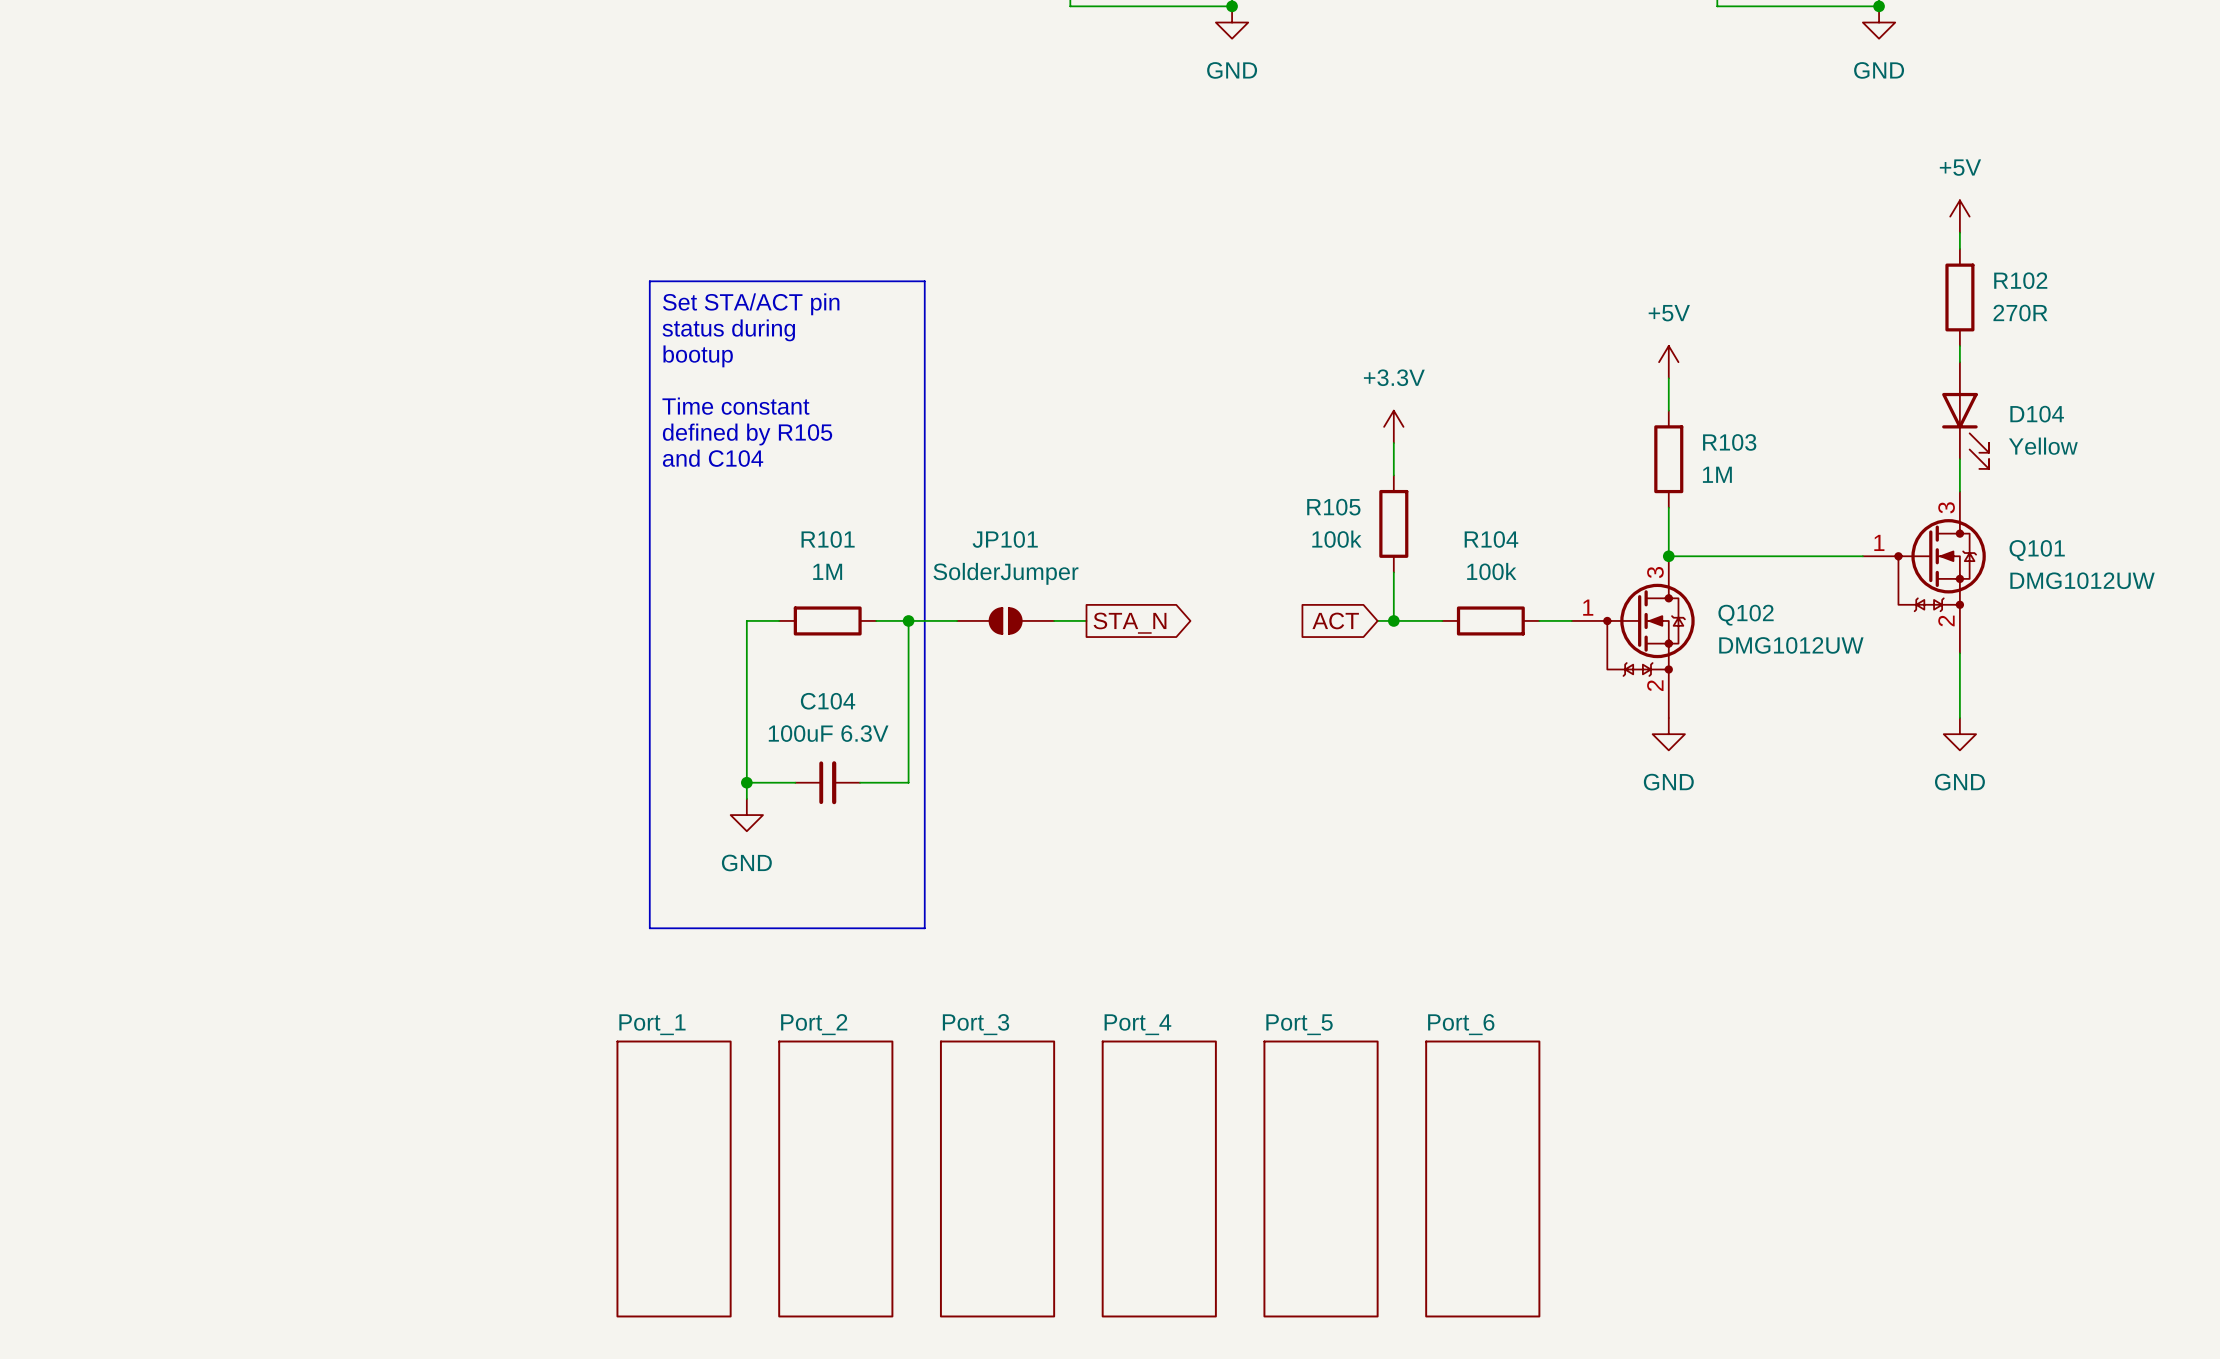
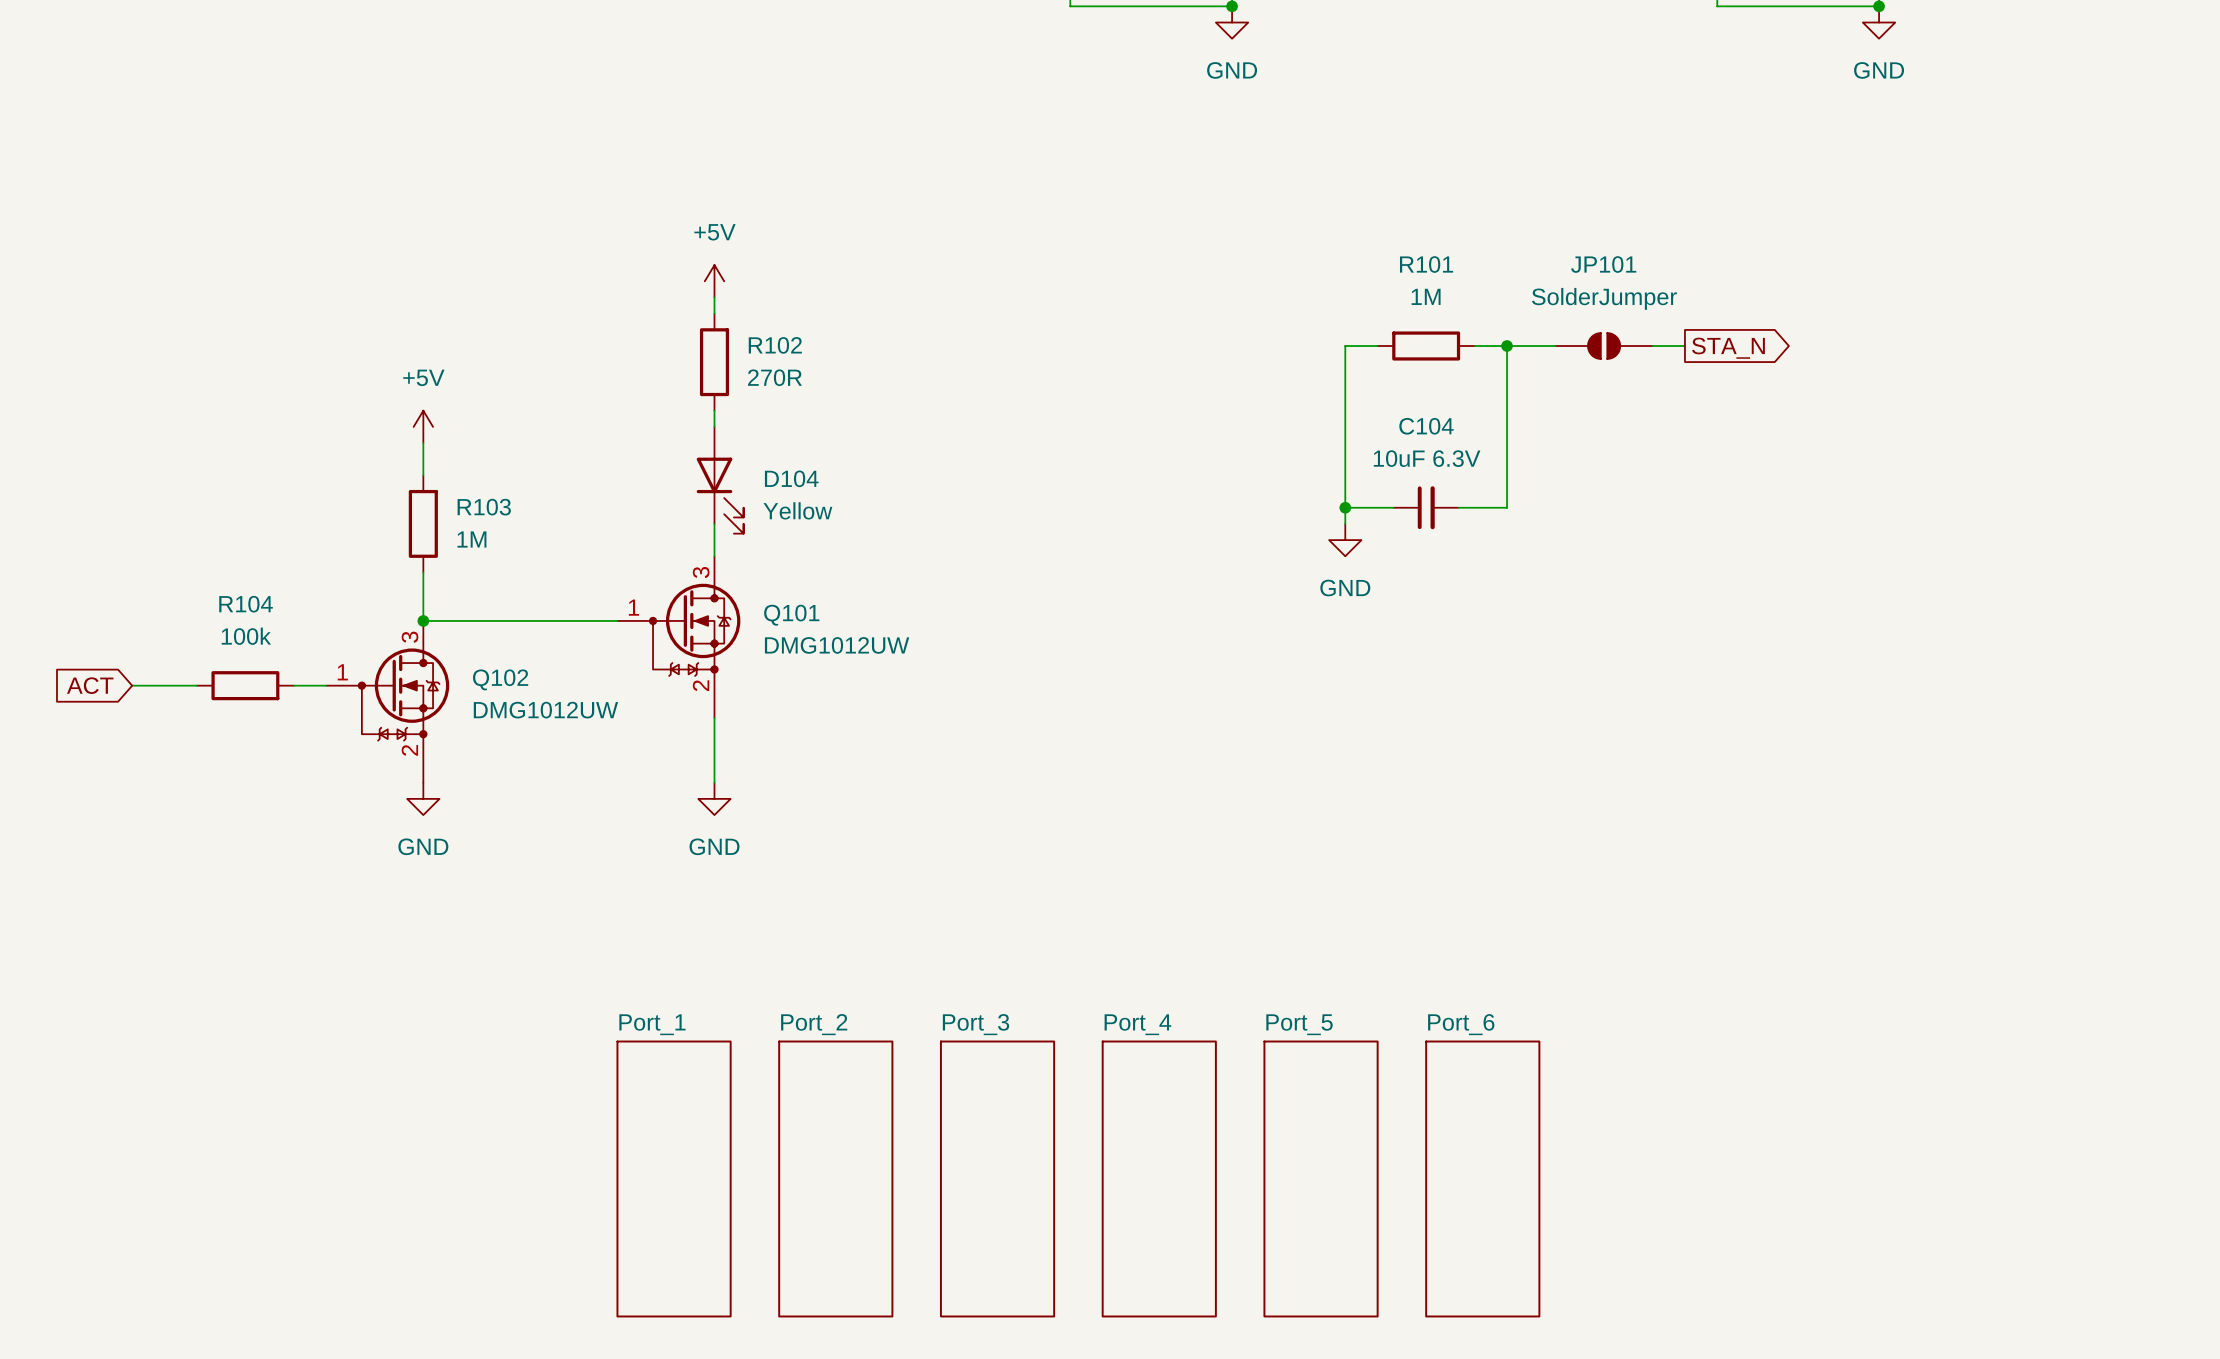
power symbol: +5V (1959, 216) -> none
wire: (1959, 232) (1959, 248) -> none
line: (649, 281) (924, 281) (924, 928) (649, 928) (649, 281) -> none
power symbol: none -> +5V (714, 281)
wire: none -> (714, 297) (714, 313)
R102 position: (1959, 297) -> (714, 362)
text: Set STA/ACT pin (751, 304) -> none
text: status during (728, 330) -> none
wire: none -> (1377, 346) (1345, 346) (1345, 523)
wire: none -> (1474, 346) (1555, 346)
wire: none -> (1507, 346) (1507, 507) (1458, 507)
junction: none -> (1507, 346)
wire: (1959, 346) (1959, 362) -> none
global label: none -> STA_N (1728, 348)
text: bootup (698, 356) -> none
power symbol: +5V (1668, 362) -> none
wire: (1668, 378) (1668, 410) -> none
text: Time constant (735, 406) -> none
wire: none -> (714, 410) (714, 426)
D104 position: (1965, 415) -> (720, 480)
power symbol: none -> +5V (423, 426)
power symbol: +3.3V (1393, 426) -> none
text: defined by R105 (747, 434) -> none
wire: none -> (423, 443) (423, 475)
wire: (1393, 443) (1393, 475) -> none
text: and C104 (713, 458) -> none
R103 position: (1668, 459) -> (423, 523)
wire: (1959, 459) (1959, 491) -> none
wire: none -> (1345, 507) (1393, 507)
junction: none -> (1345, 507)
wire: (1668, 507) (1668, 556) (1862, 556) -> none
wire: none -> (714, 523) (714, 556)
R105: 100k (1393, 523) -> none
power symbol: none -> GND (1345, 540)
junction: (1668, 556) -> none
wire: none -> (423, 572) (423, 620) (617, 620)
wire: (1393, 572) (1393, 620) -> none
Q101 position: (1924, 572) -> (678, 637)
junction: none -> (423, 620)
wire: (779, 620) (746, 620) (746, 798) -> none
R101 position: (827, 620) -> (1426, 346)
wire: (876, 620) (957, 620) -> none
wire: (908, 620) (908, 782) (860, 782) -> none
junction: (908, 620) -> none
JP101 position: (1005, 620) -> (1604, 346)
wire: (1054, 620) (1086, 620) -> none
global label: ACT (1335, 620) -> none
wire: (1377, 620) (1442, 620) -> none
junction: (1393, 620) -> none
R104 position: (1490, 620) -> (245, 685)
wire: (1539, 620) (1571, 620) -> (1652, 346) (1684, 346)
global label: STA_N (1130, 623) -> none
Q102 position: (1633, 637) -> (387, 701)
wire: (1959, 653) (1959, 718) -> none
global label: none -> ACT (90, 685)
wire: none -> (132, 685) (196, 685)
wire: none -> (293, 685) (326, 685)
wire: none -> (714, 718) (714, 782)
C104 value: 100uF 6.3V (828, 733) -> 10uF 6.3V (1427, 458)
power symbol: GND (1668, 734) -> none
power symbol: GND (1959, 734) -> none
wire: (746, 782) (795, 782) -> none
junction: (746, 782) -> none
C104 position: (827, 782) -> (1426, 507)
power symbol: none -> GND (423, 798)
power symbol position: GND (746, 815) -> GND (714, 798)

